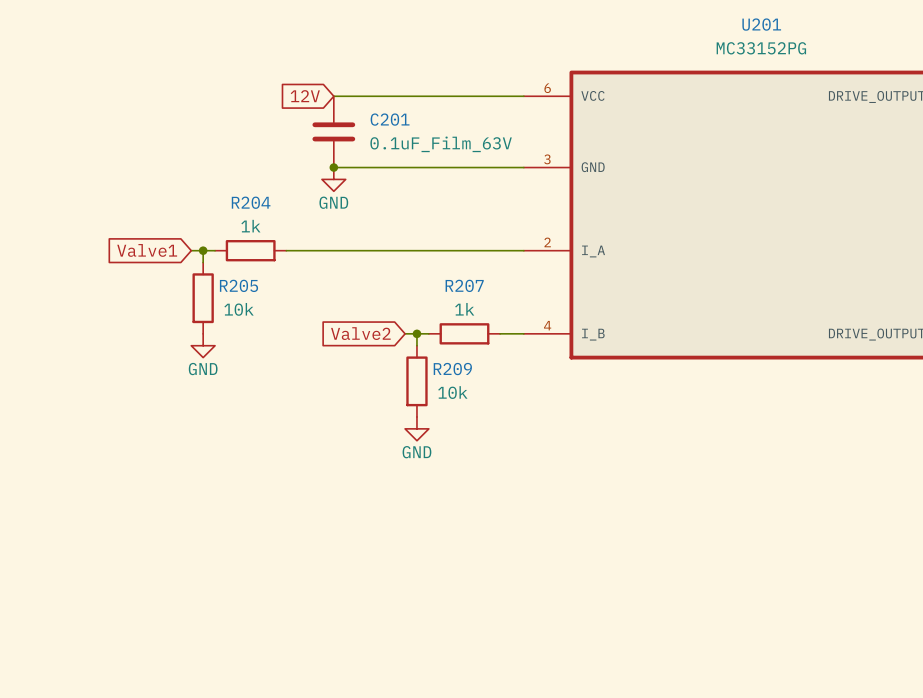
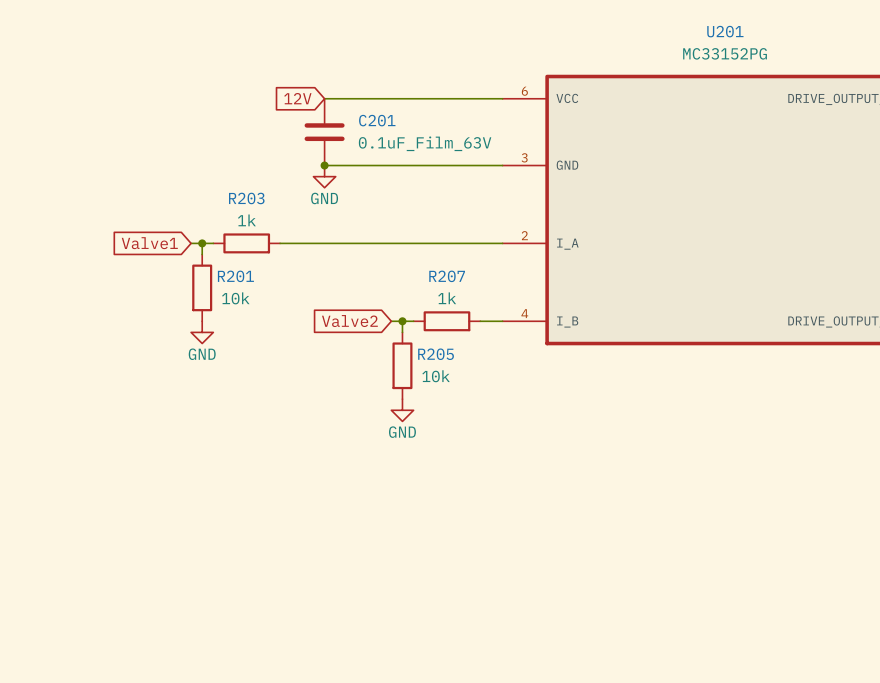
R204 name: R204 (251, 202) -> R203 (246, 198)
R205 name: R205 (238, 285) -> R201 (235, 276)
R209 name: R209 (452, 369) -> R205 (436, 354)

